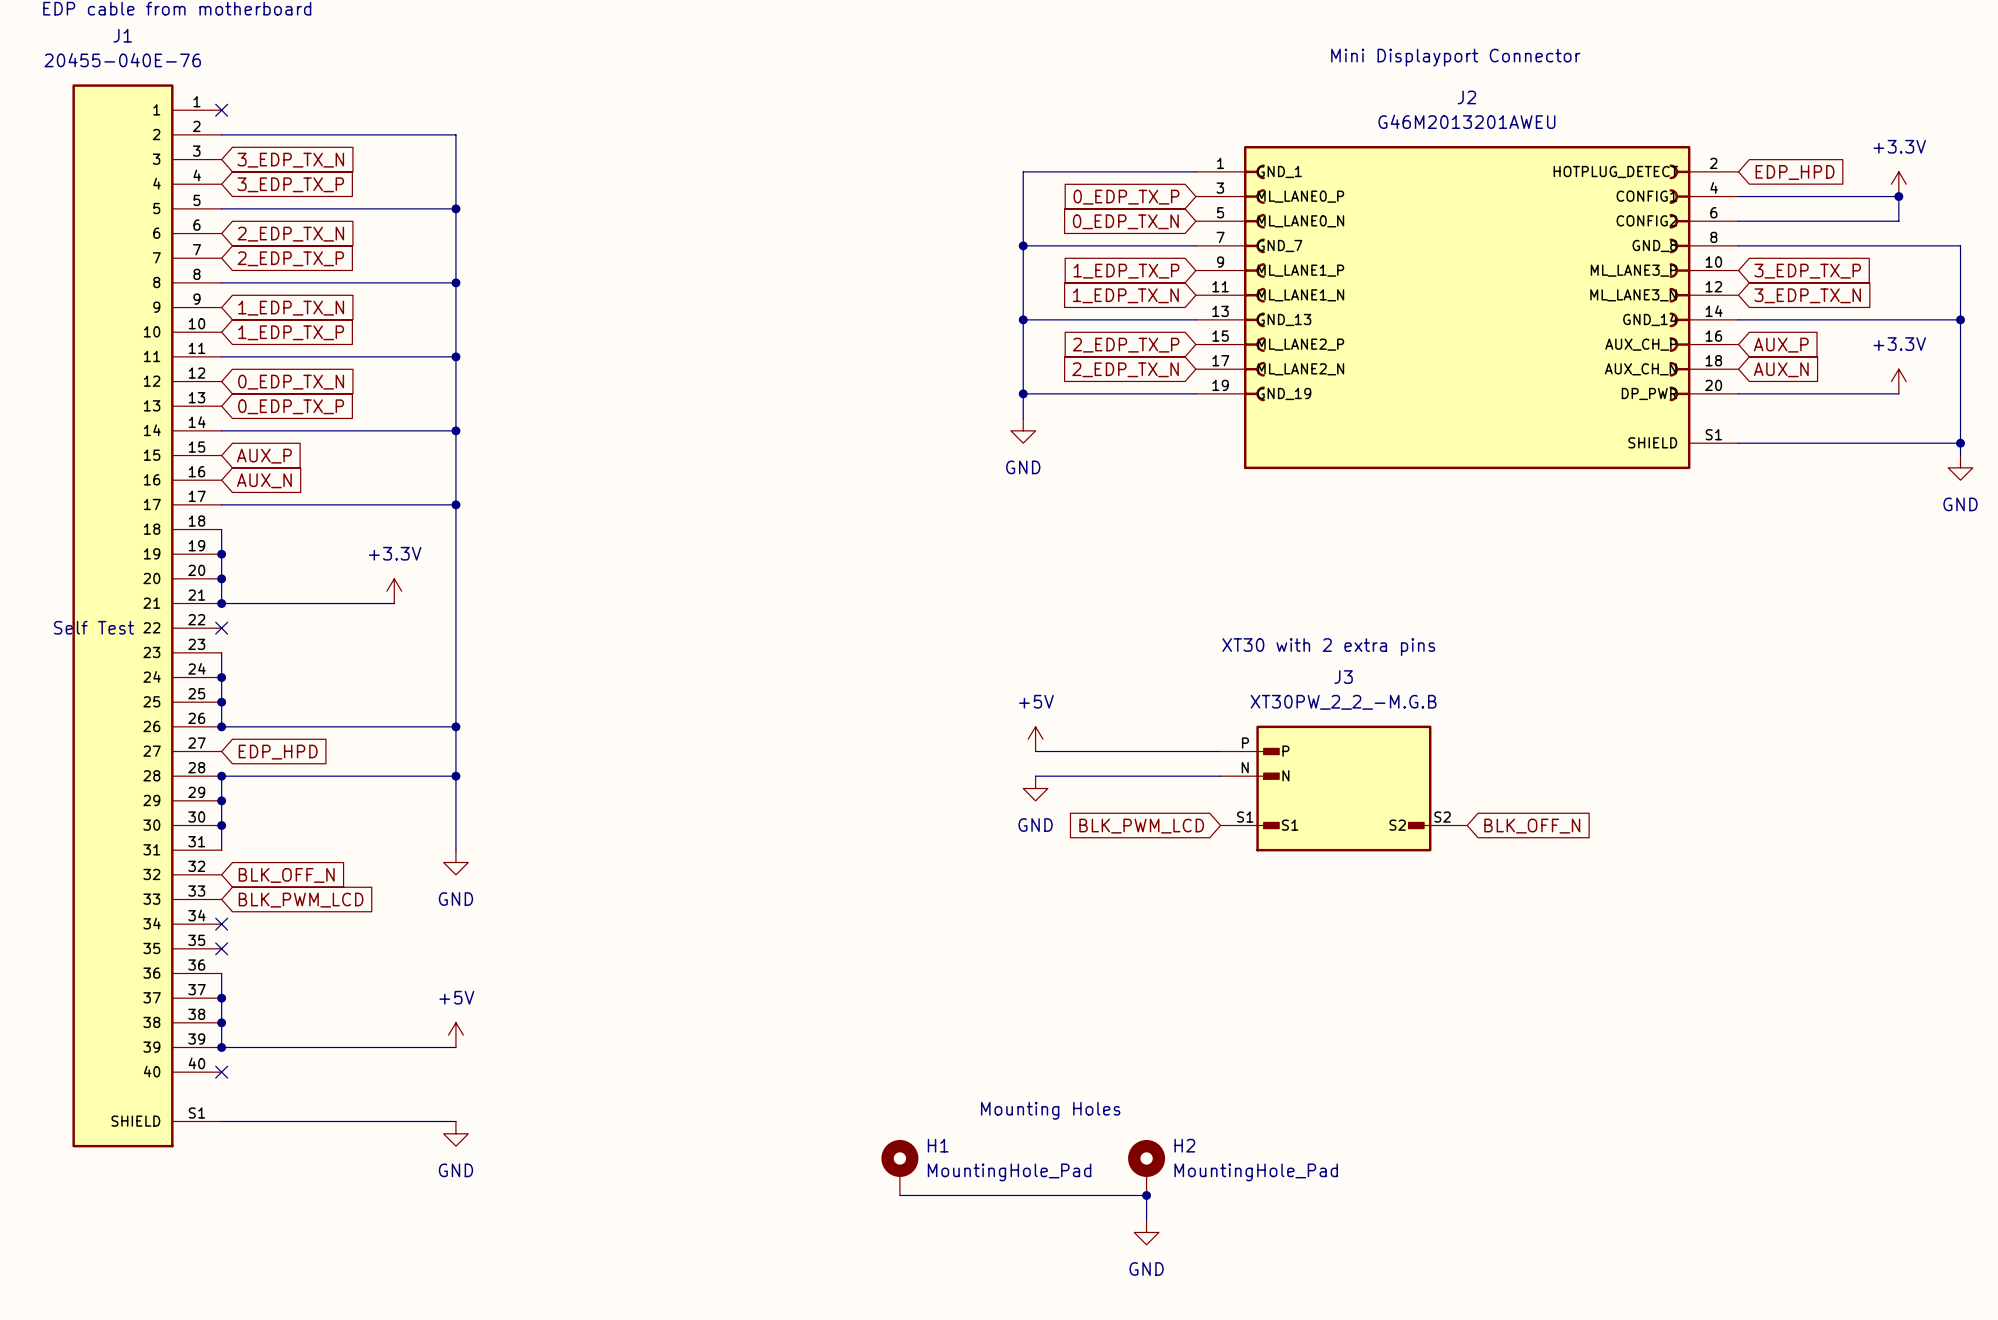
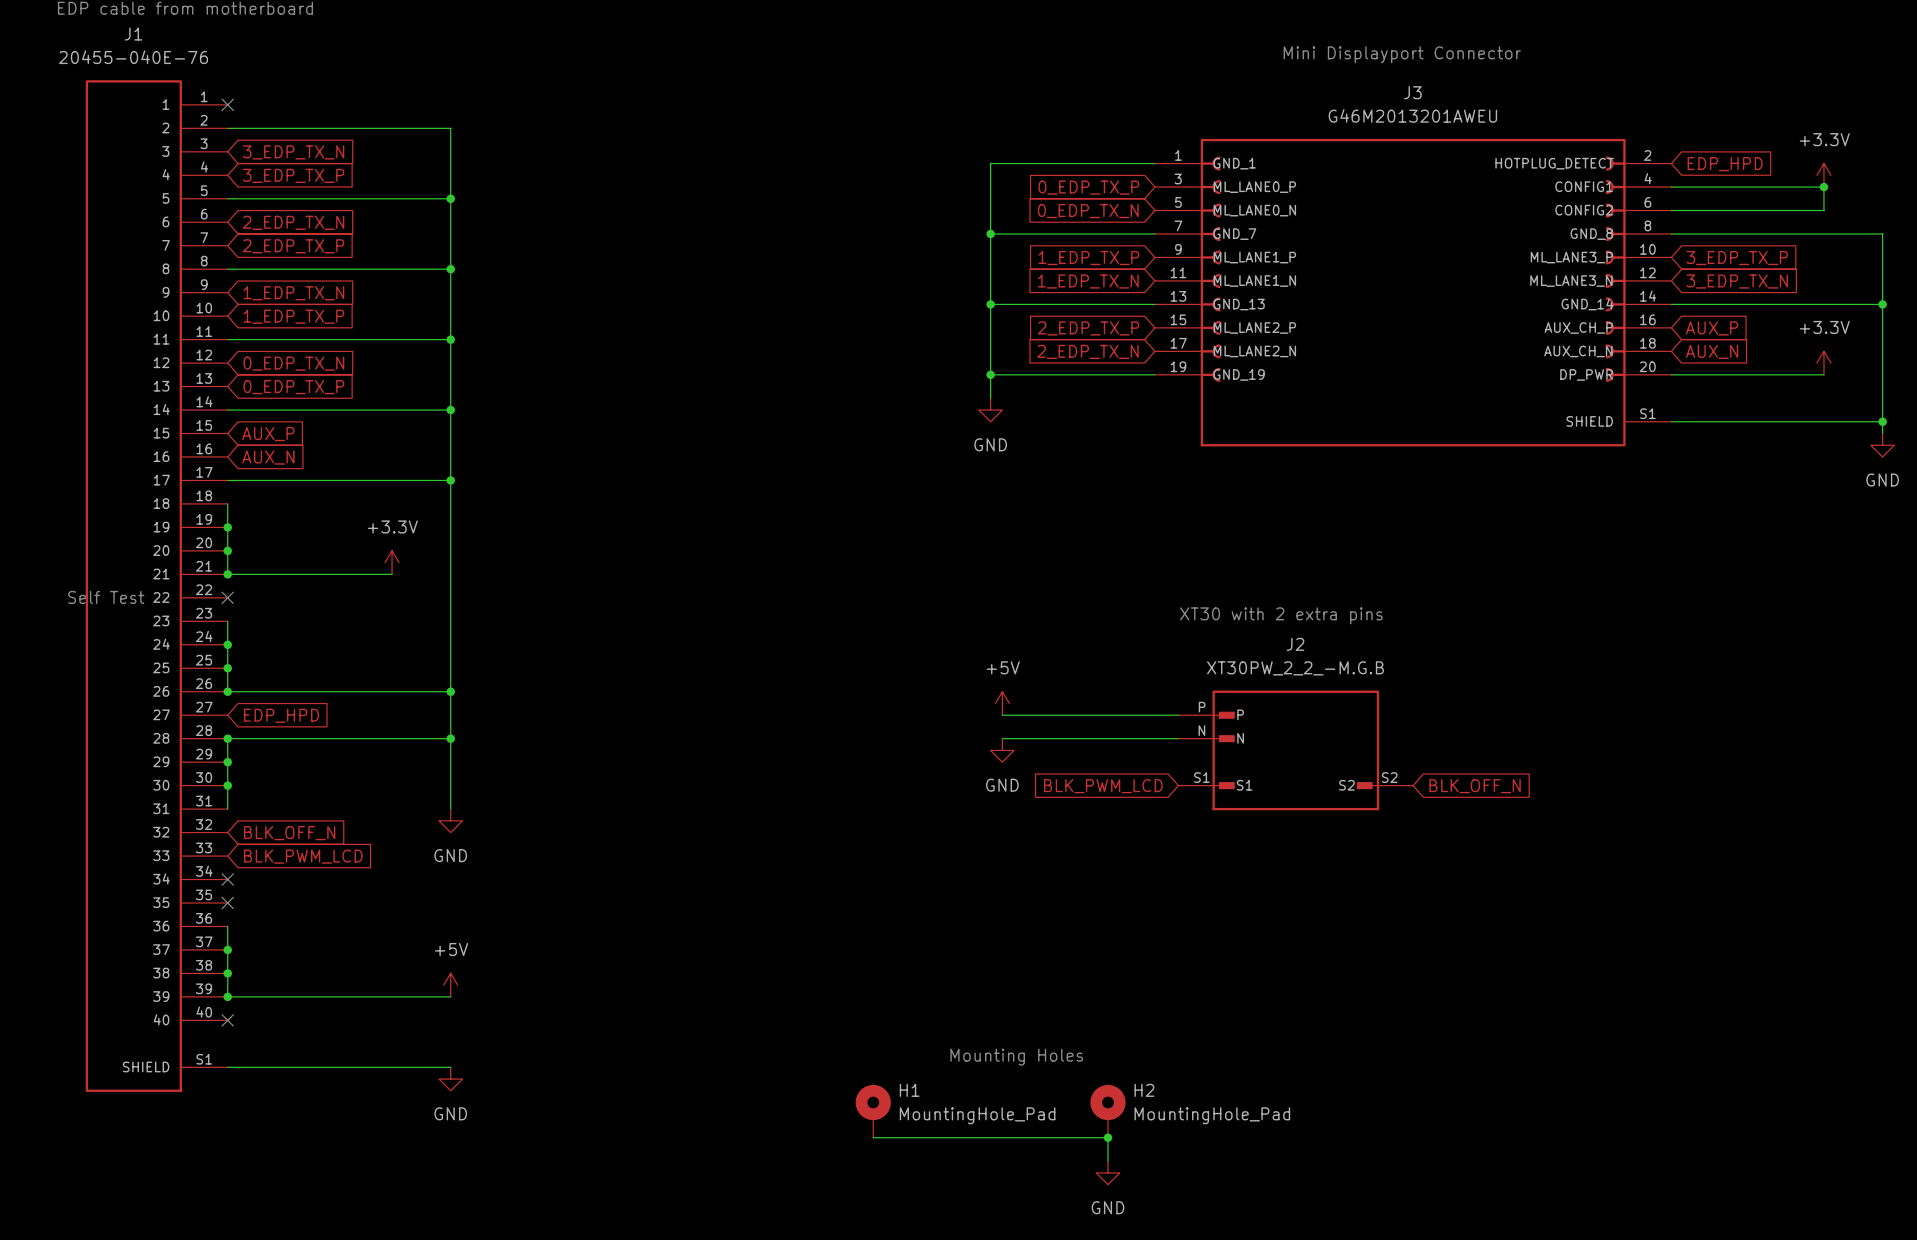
J2 name: J2 (1466, 97) -> J3 (1412, 92)
J3 name: J3 (1343, 677) -> J2 (1295, 644)

